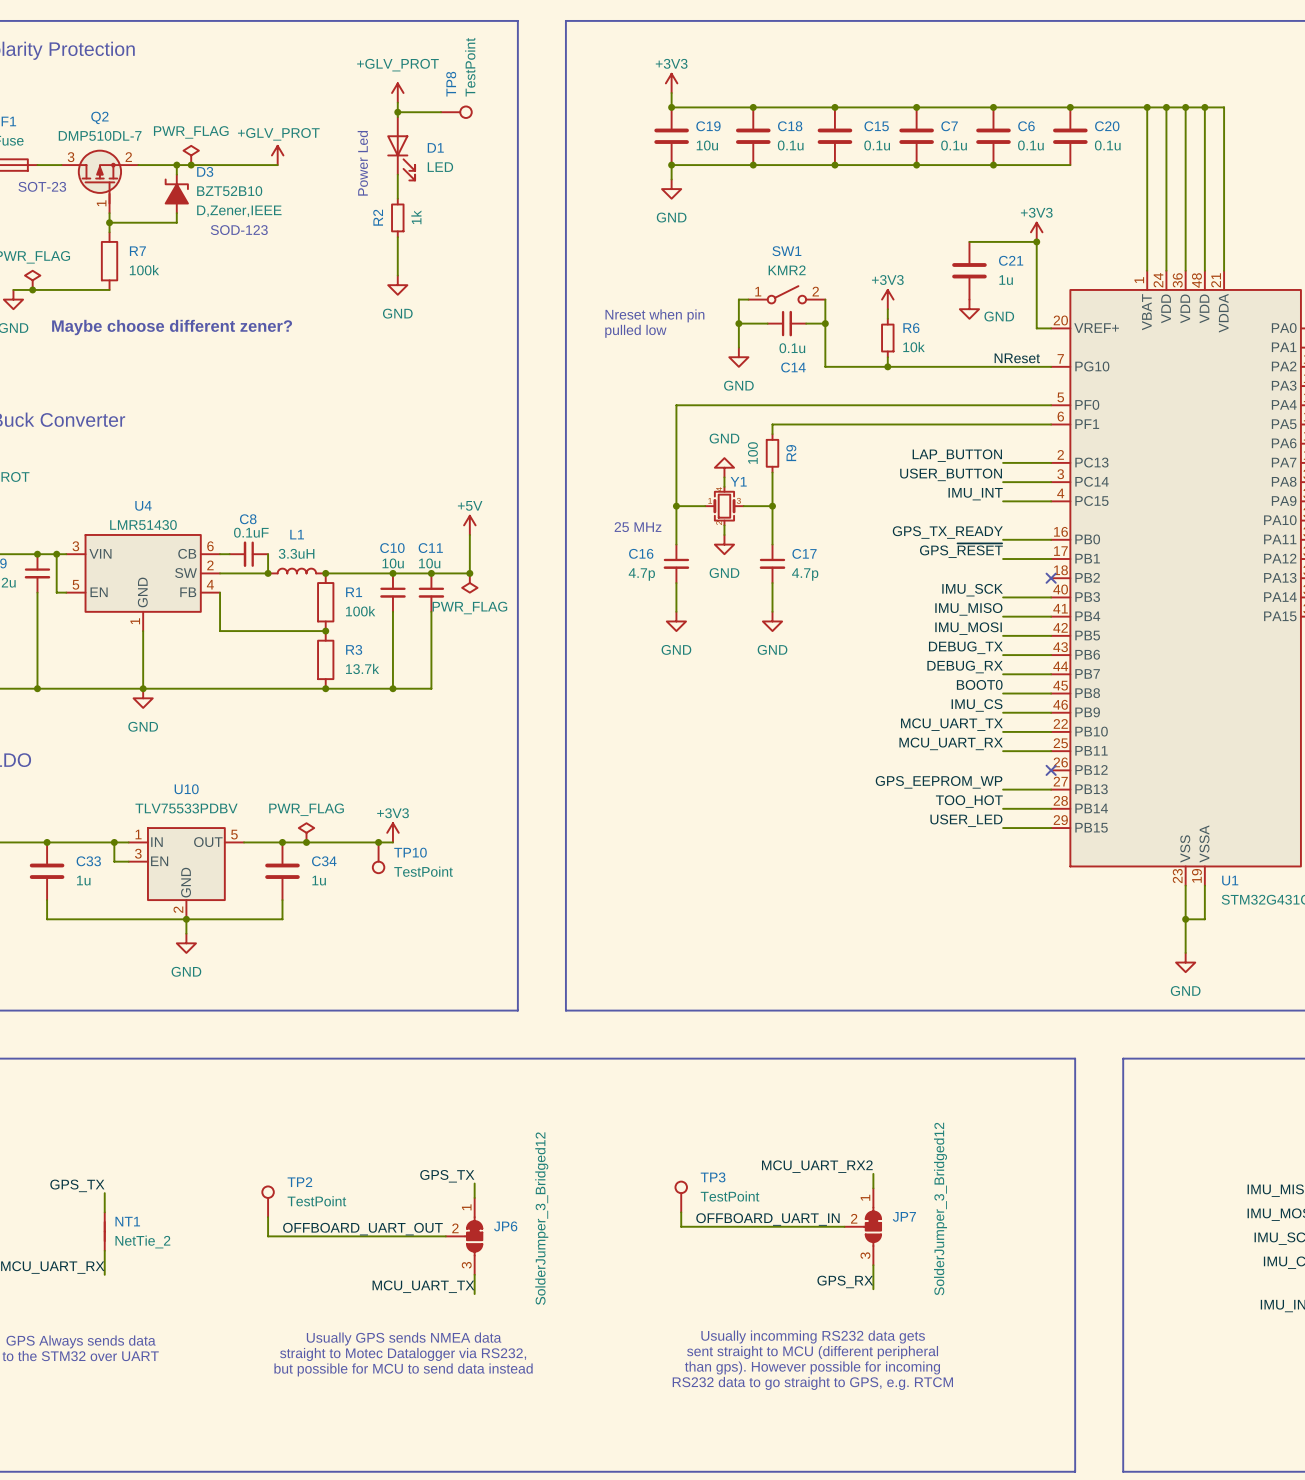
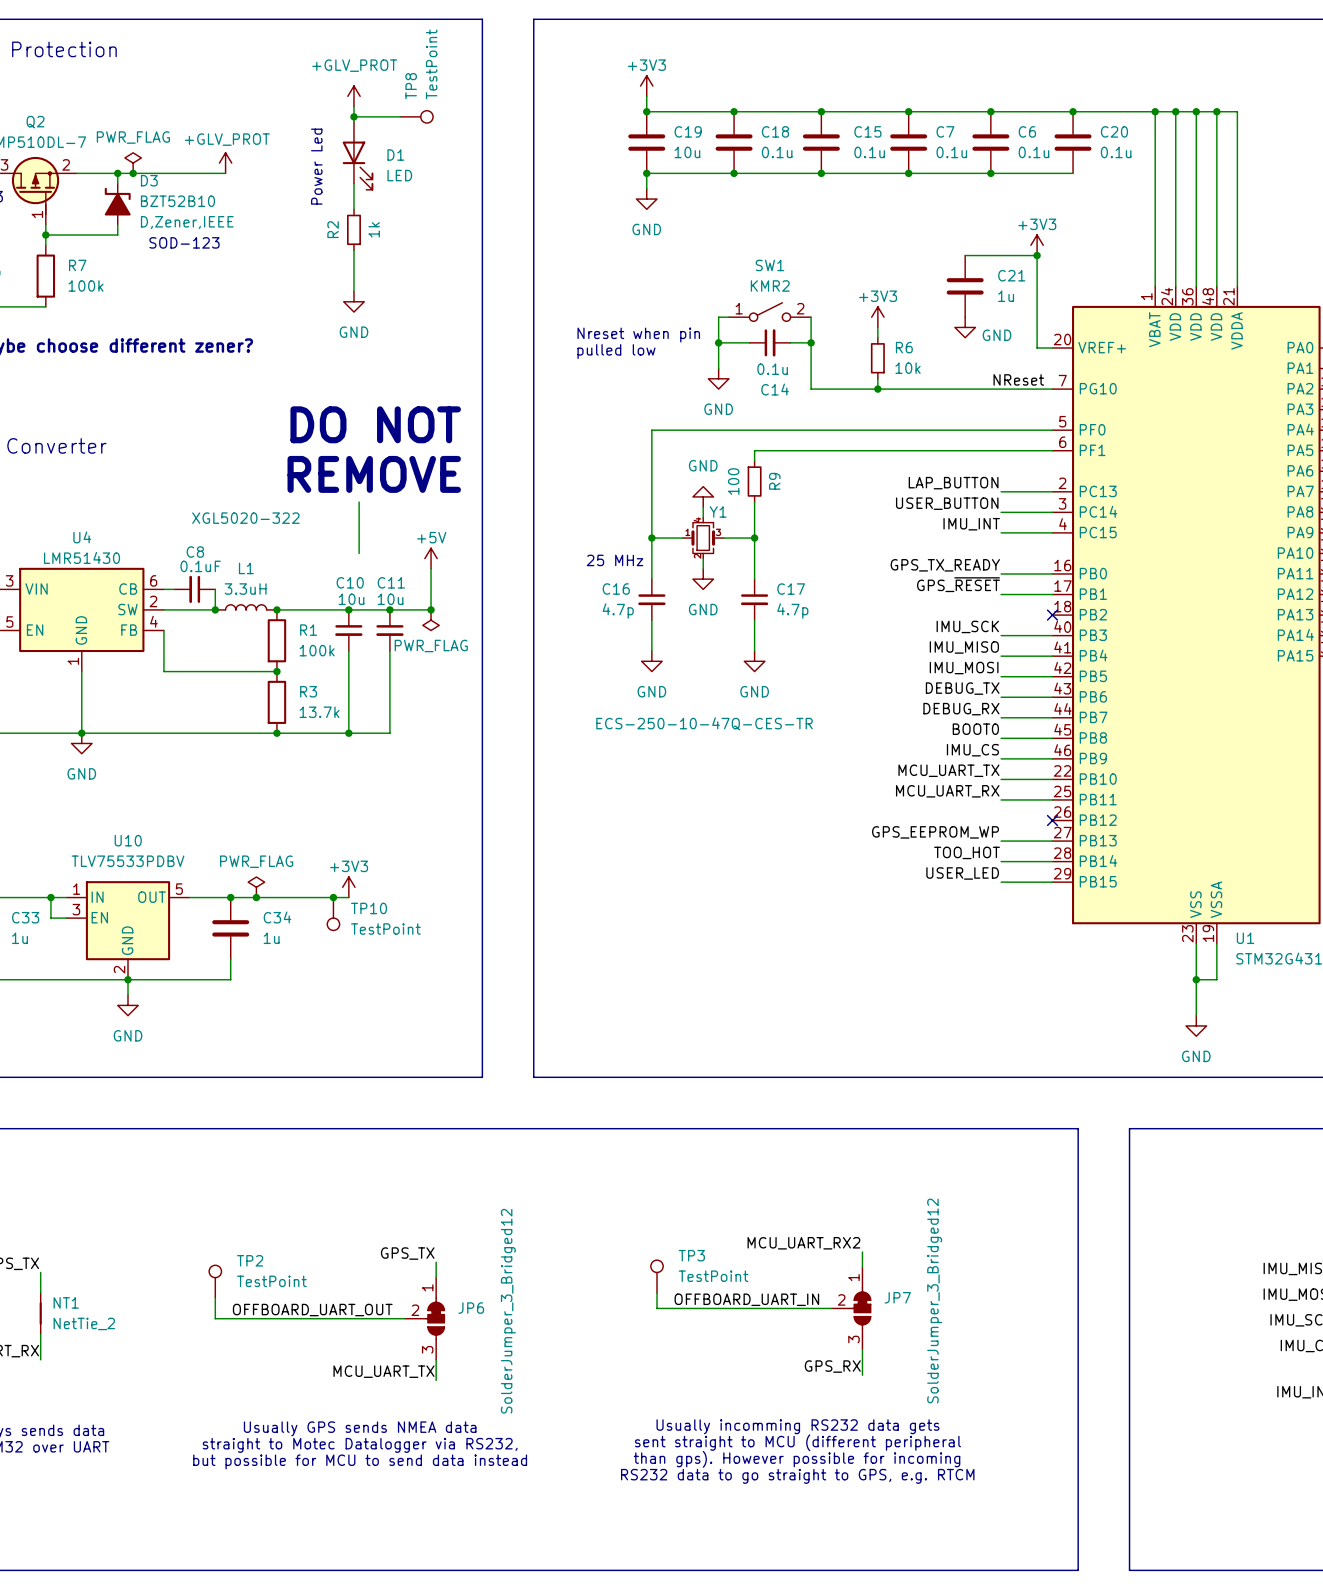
text: none -> DO NOT (375, 424)
text: none -> REMOVE (374, 474)
wire: none -> (359, 502) (359, 553)
L1 text: none -> XGL5020-322 (245, 518)
Y1 text: none -> ECS-250-10-47Q-CES-TR (704, 723)

